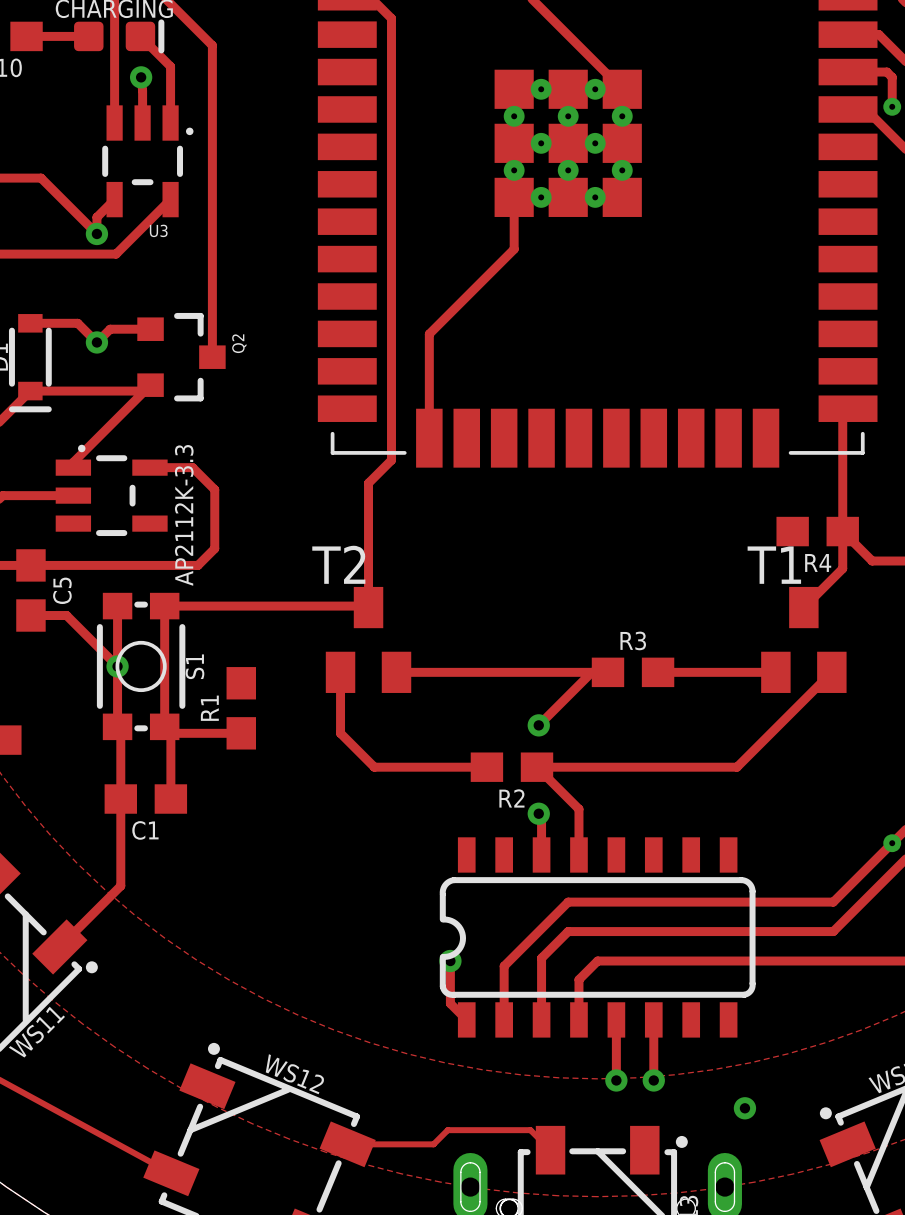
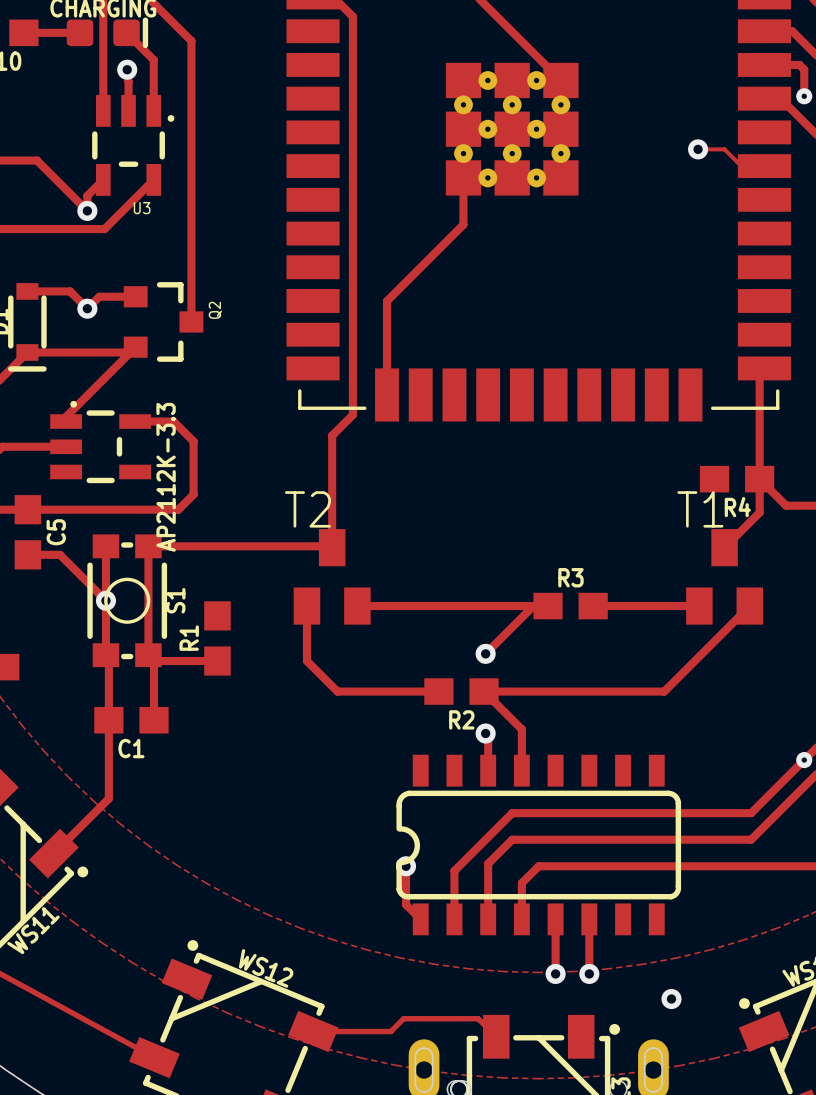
track: none -> (698, 149) (724, 149) (751, 175) (754, 175) (764, 166)
via: none -> (698, 149)

